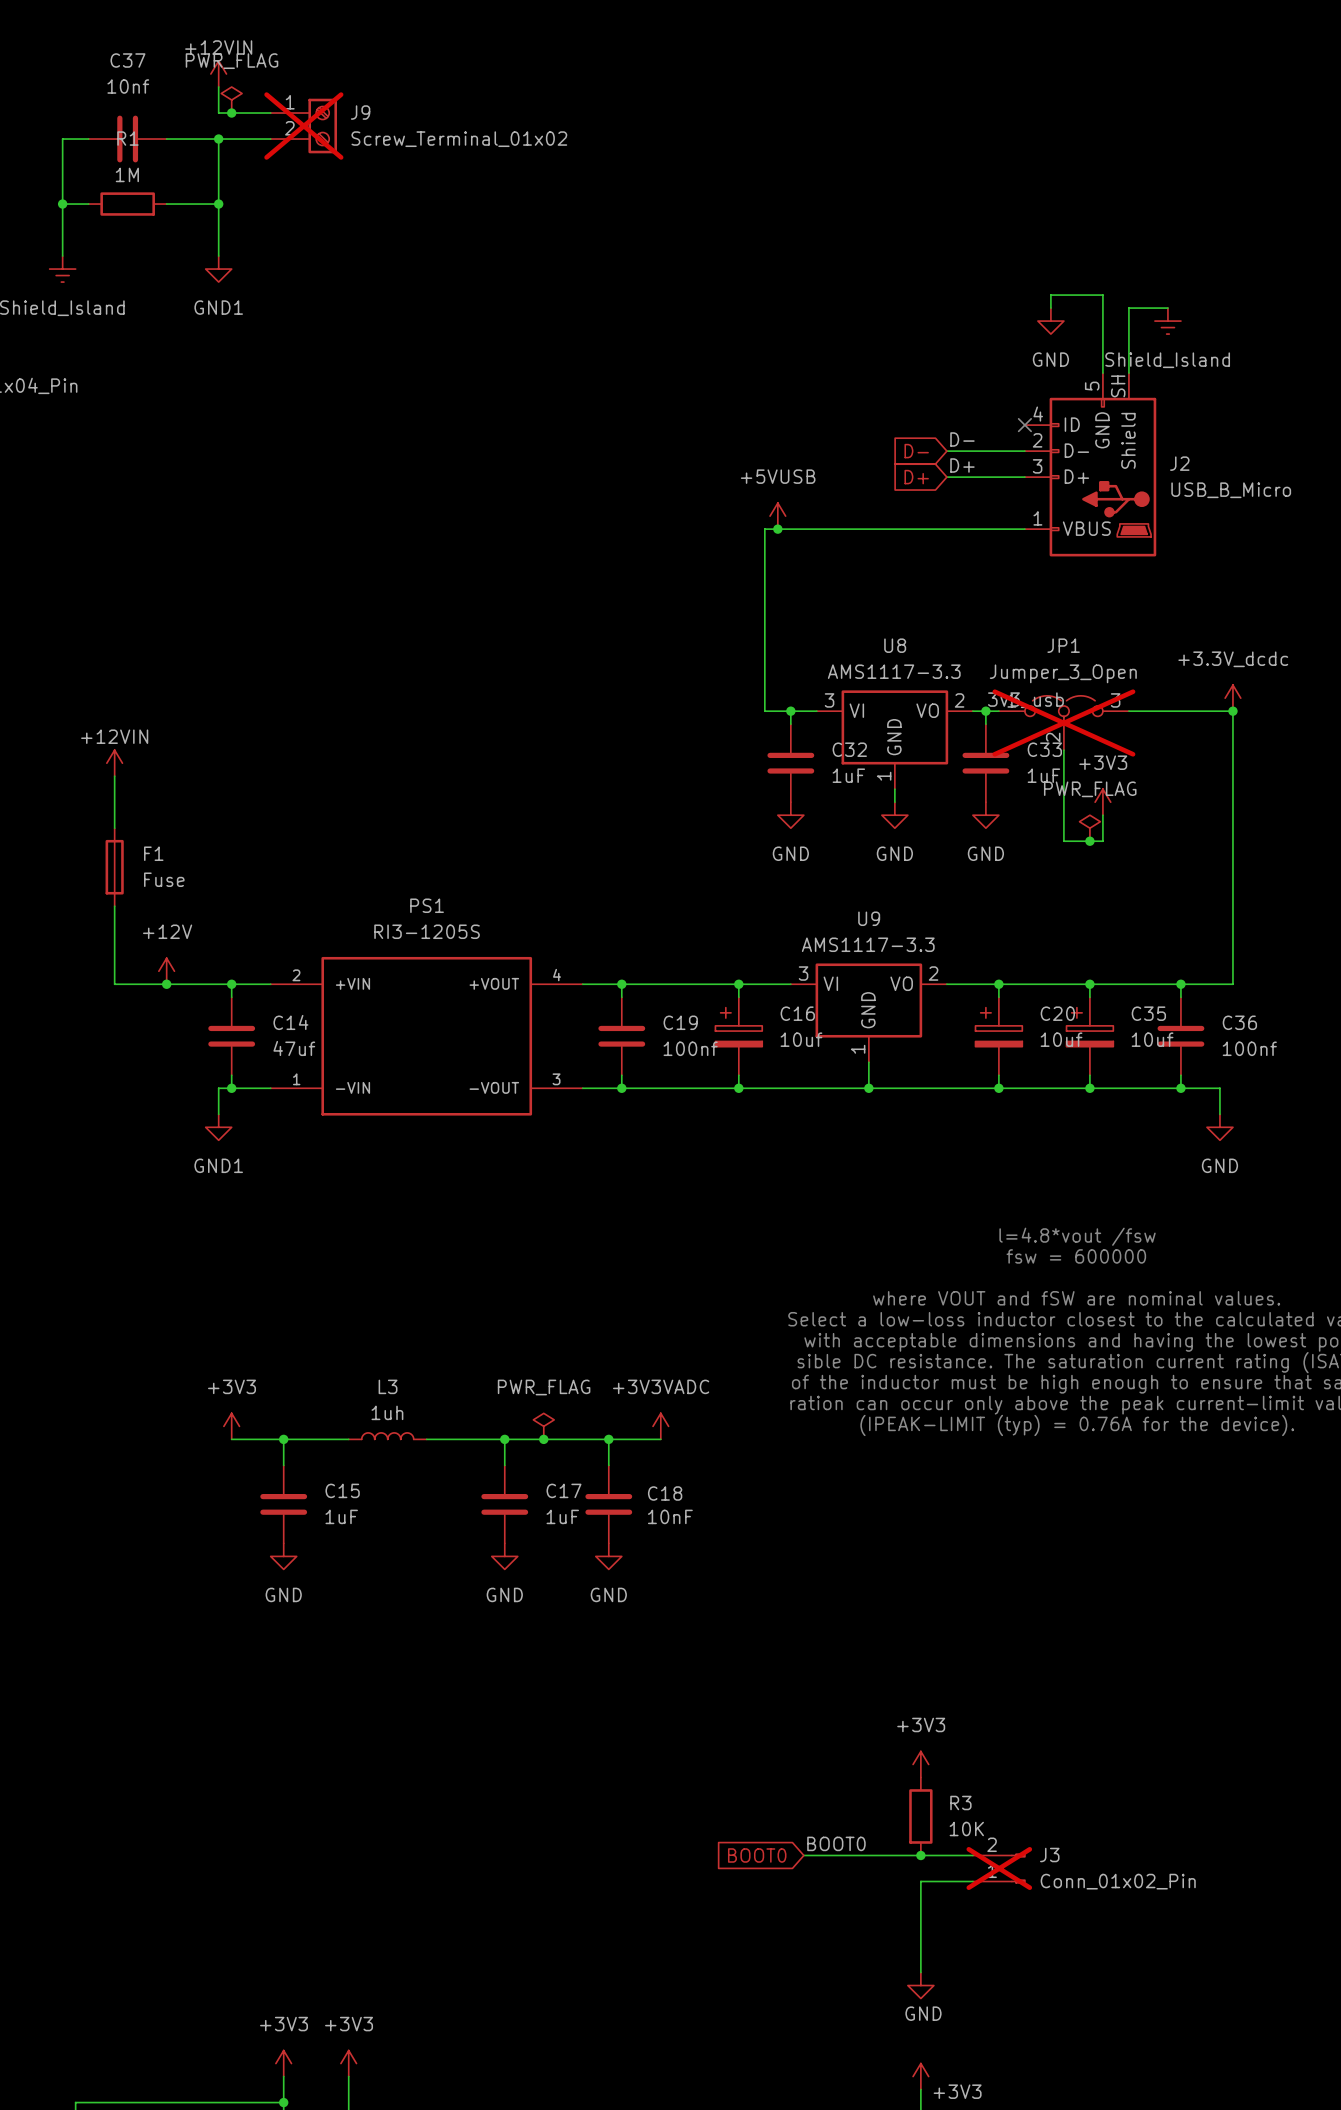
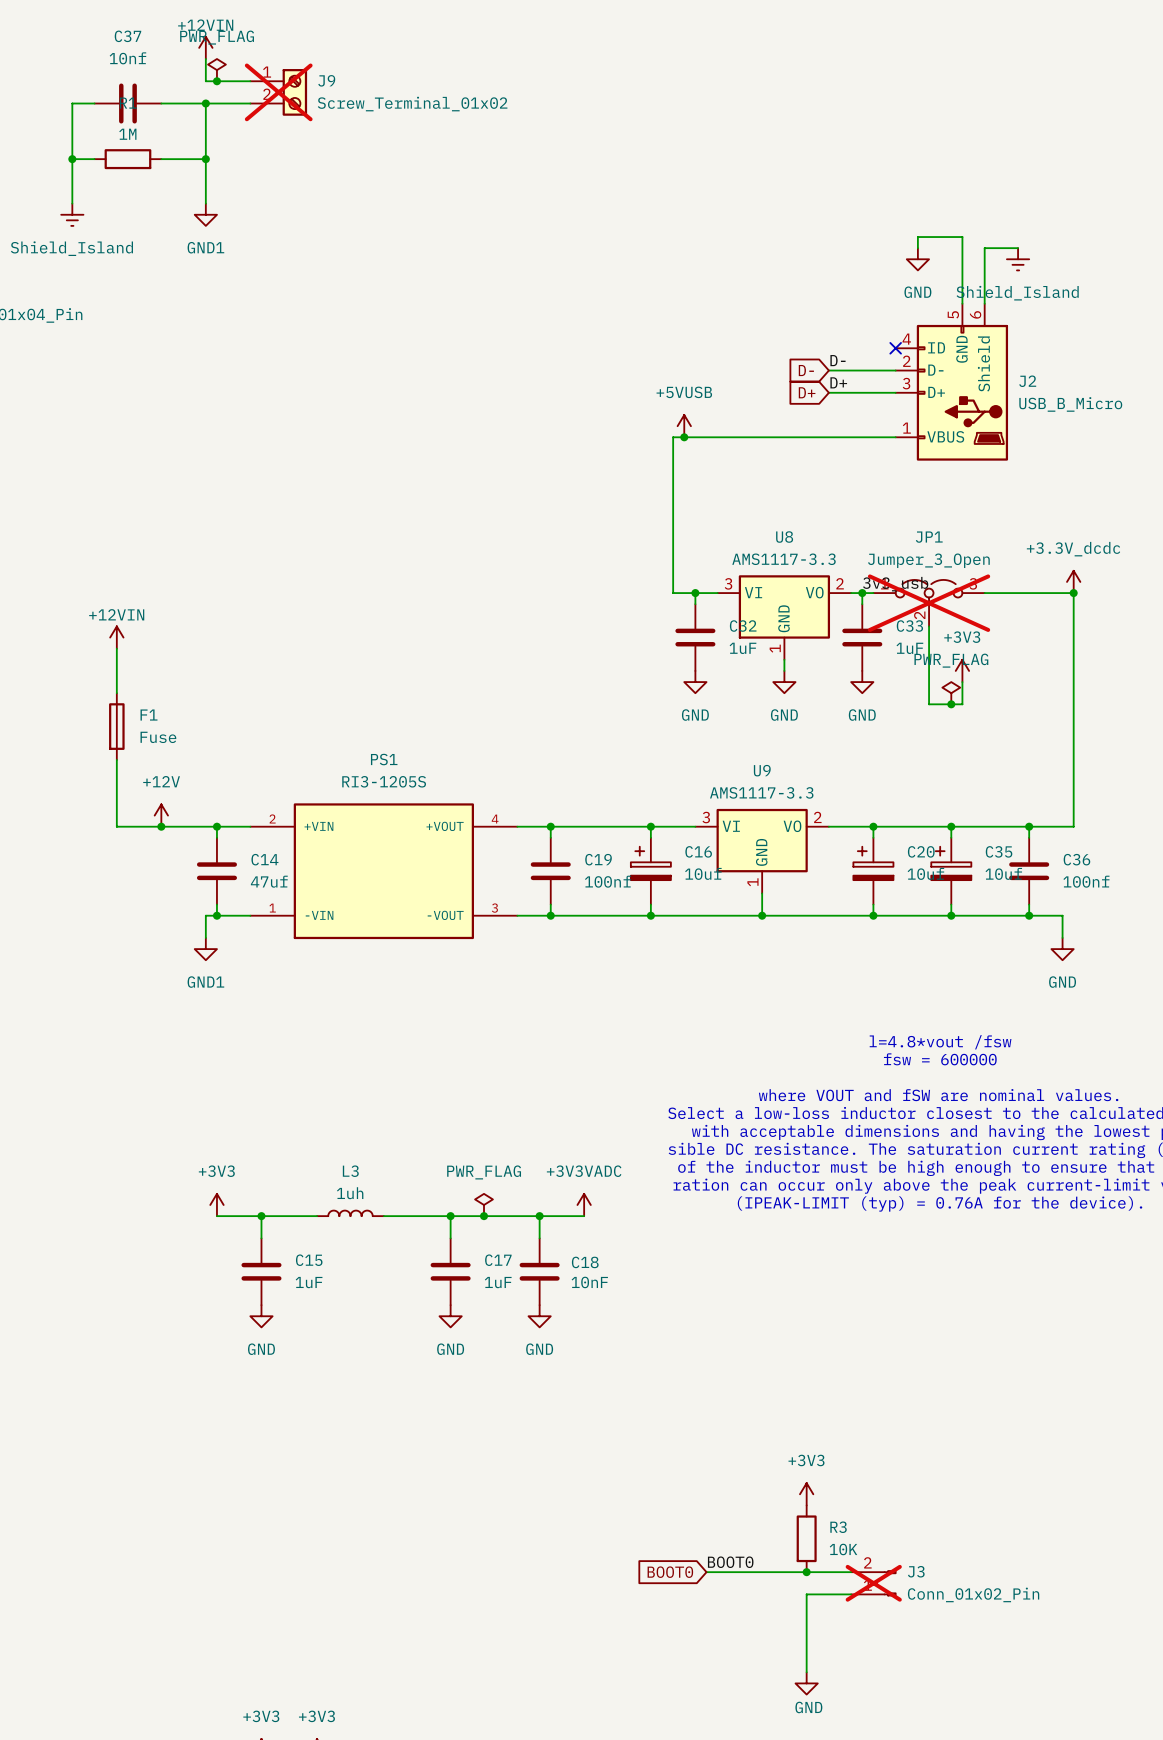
J2 pin number: SH (1118, 386) -> 6 (975, 314)

